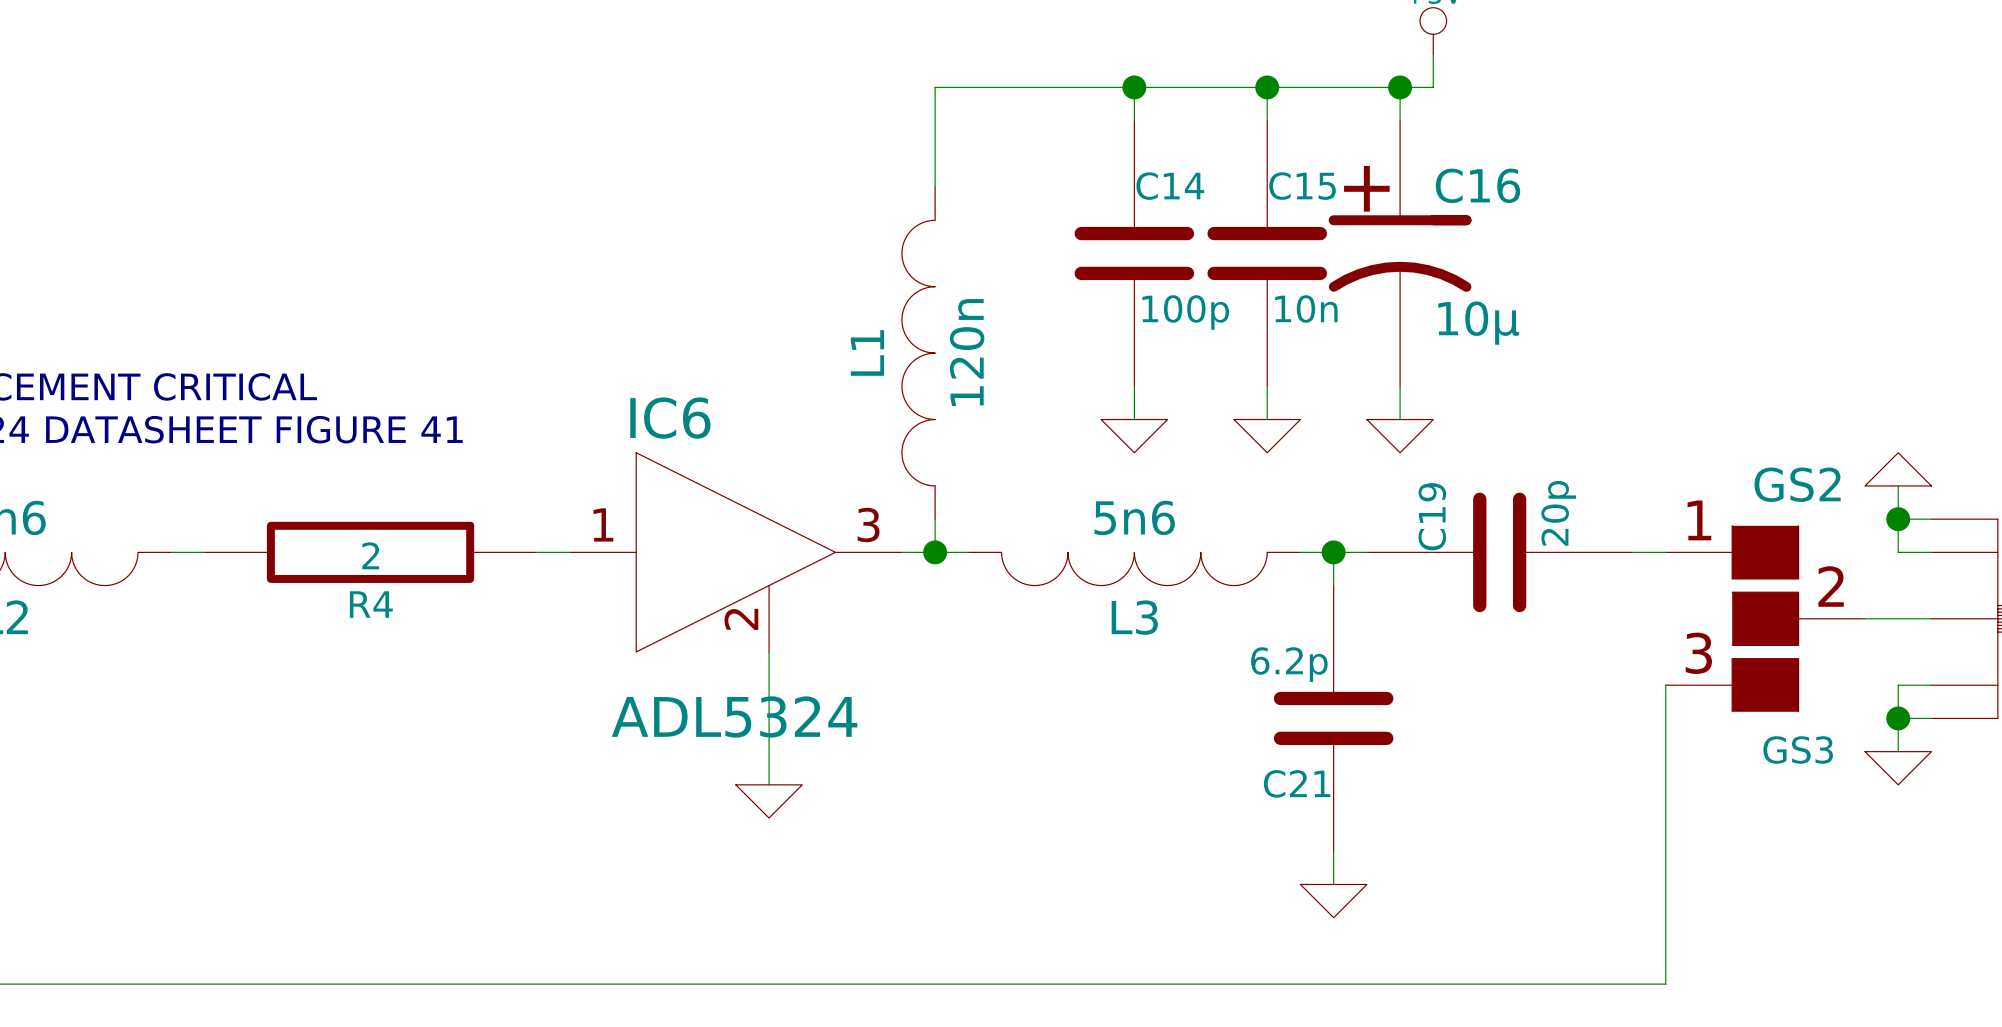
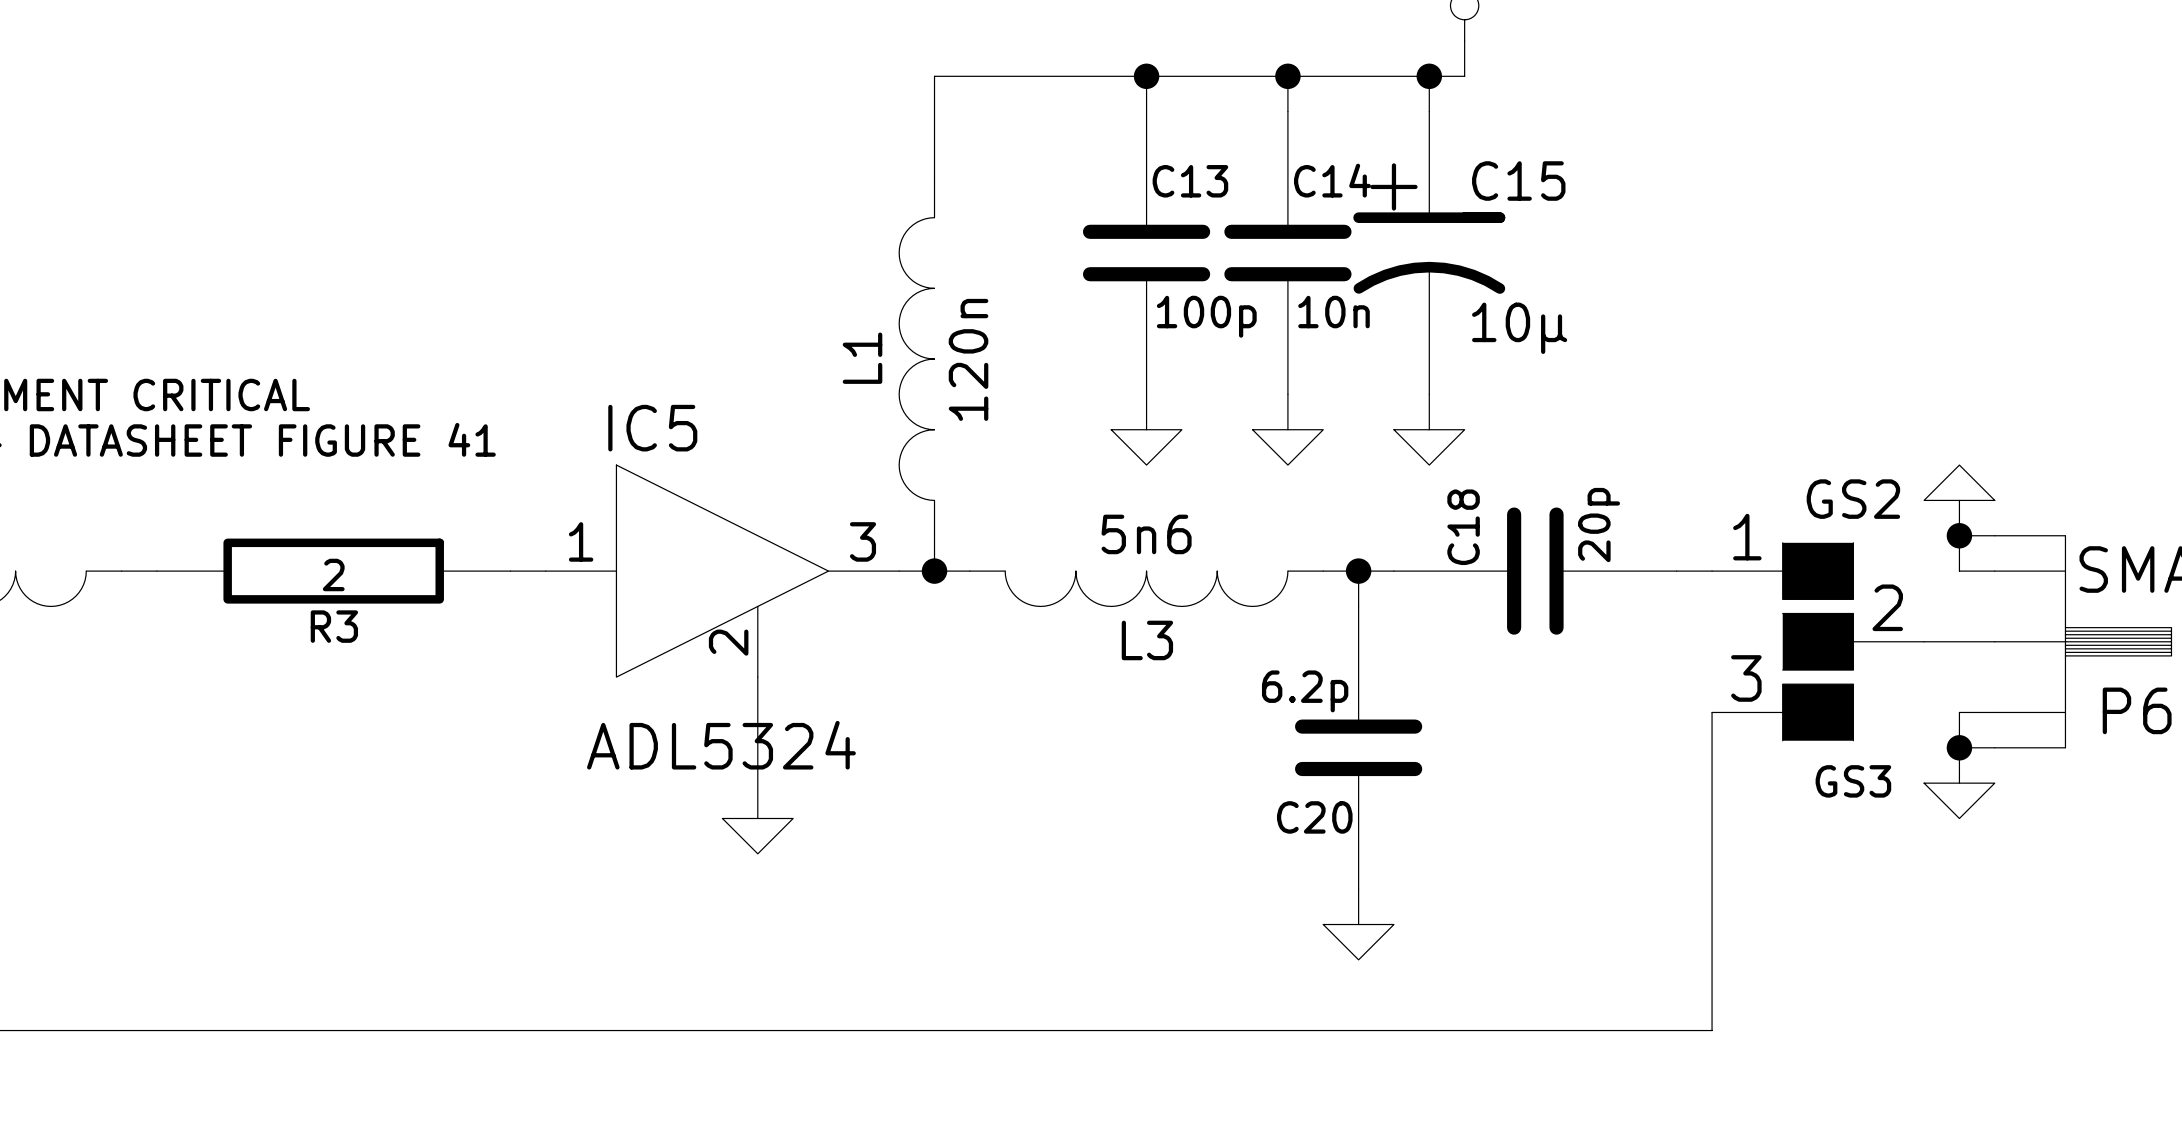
C16 name: C16 (1478, 185) -> C15 (1518, 181)
C14 name: C14 (1170, 186) -> C13 (1190, 181)
C15 name: C15 (1302, 186) -> C14 (1332, 180)
IC6 name: IC6 (670, 418) -> IC5 (652, 428)
C19 name: C19 (1432, 516) -> C18 (1463, 527)
R4 name: R4 (371, 604) -> R3 (334, 626)
C21 name: C21 (1297, 783) -> C20 (1314, 817)

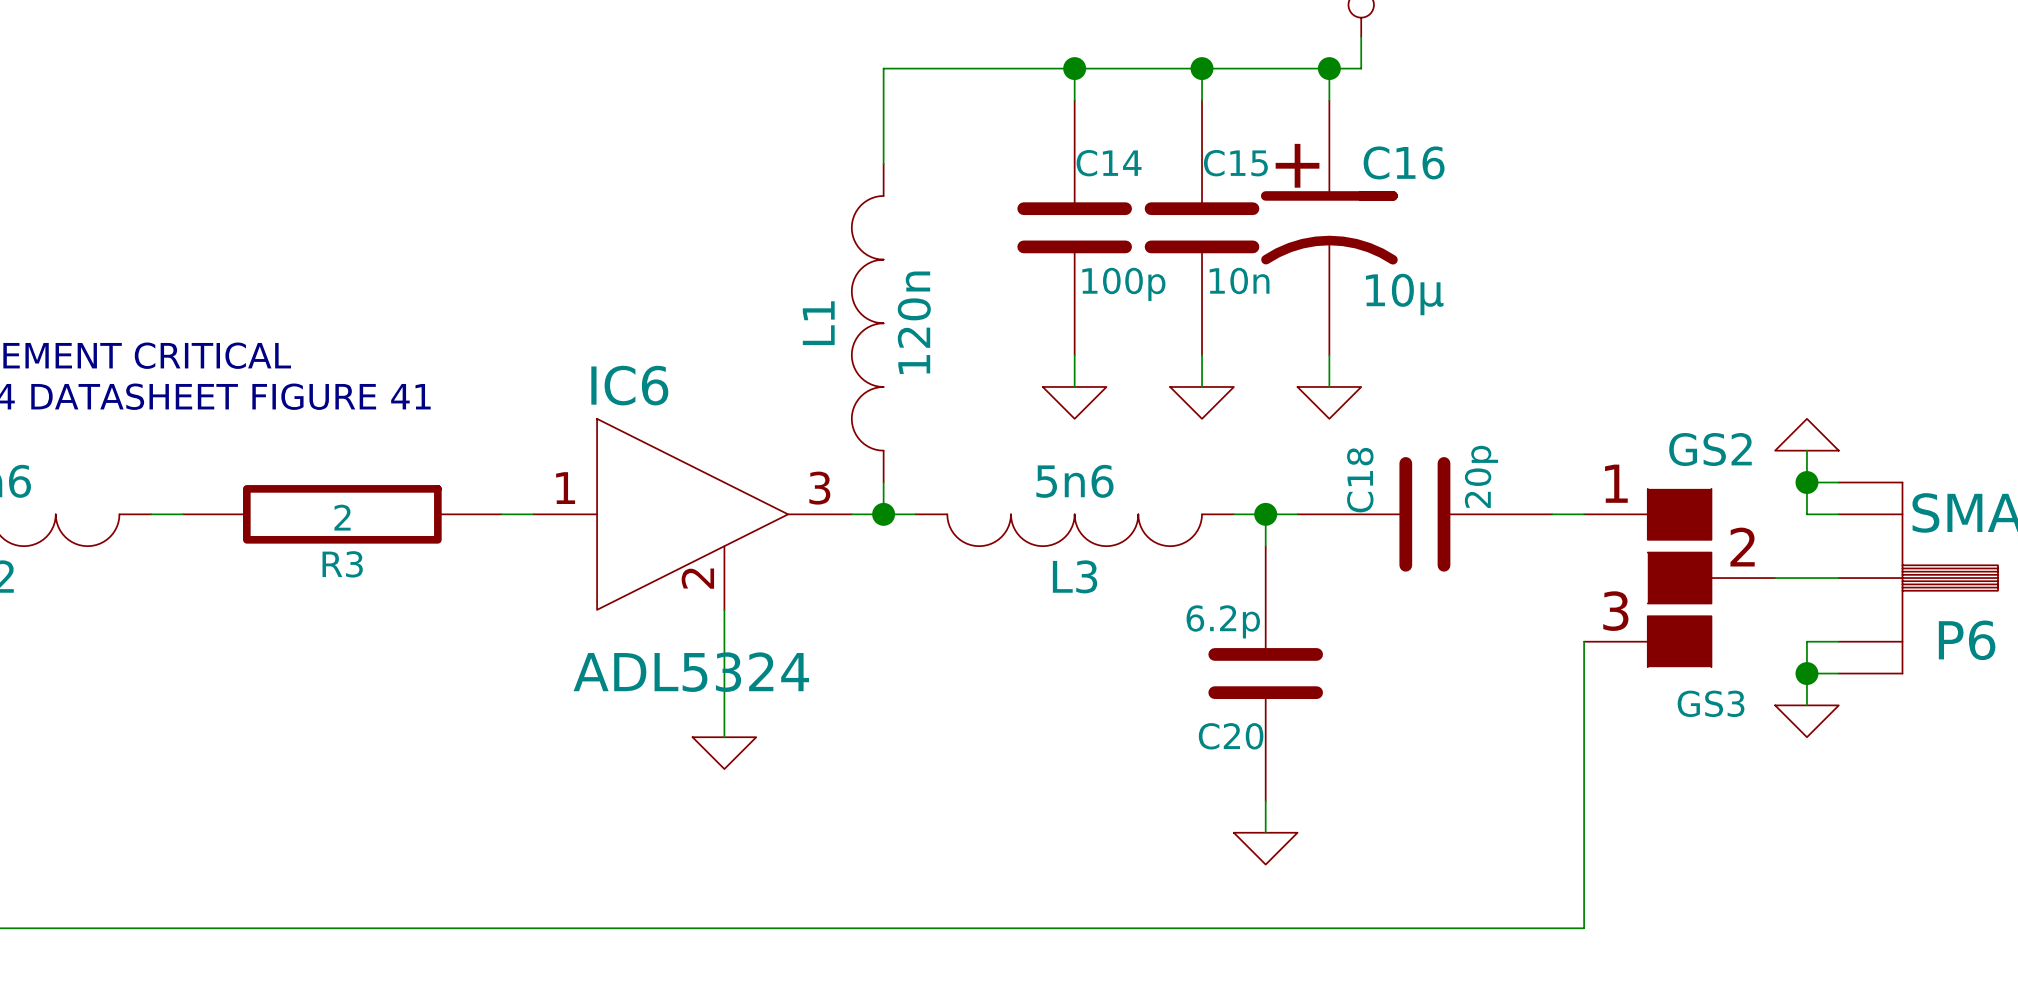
C14 name: C14 (1332, 180) -> C15 (1235, 163)
C13 name: C13 (1190, 181) -> C14 (1109, 163)
C15 name: C15 (1518, 181) -> C16 (1404, 162)
IC5 name: IC5 (652, 428) -> IC6 (629, 385)

